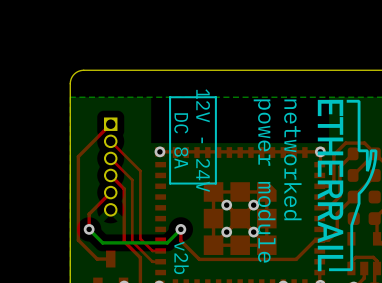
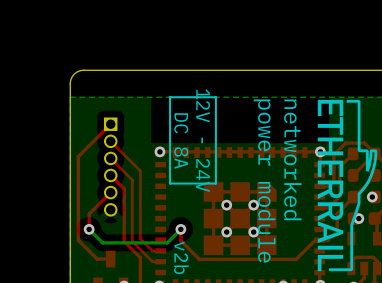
via: none -> (372, 197)
via: none -> (358, 218)

